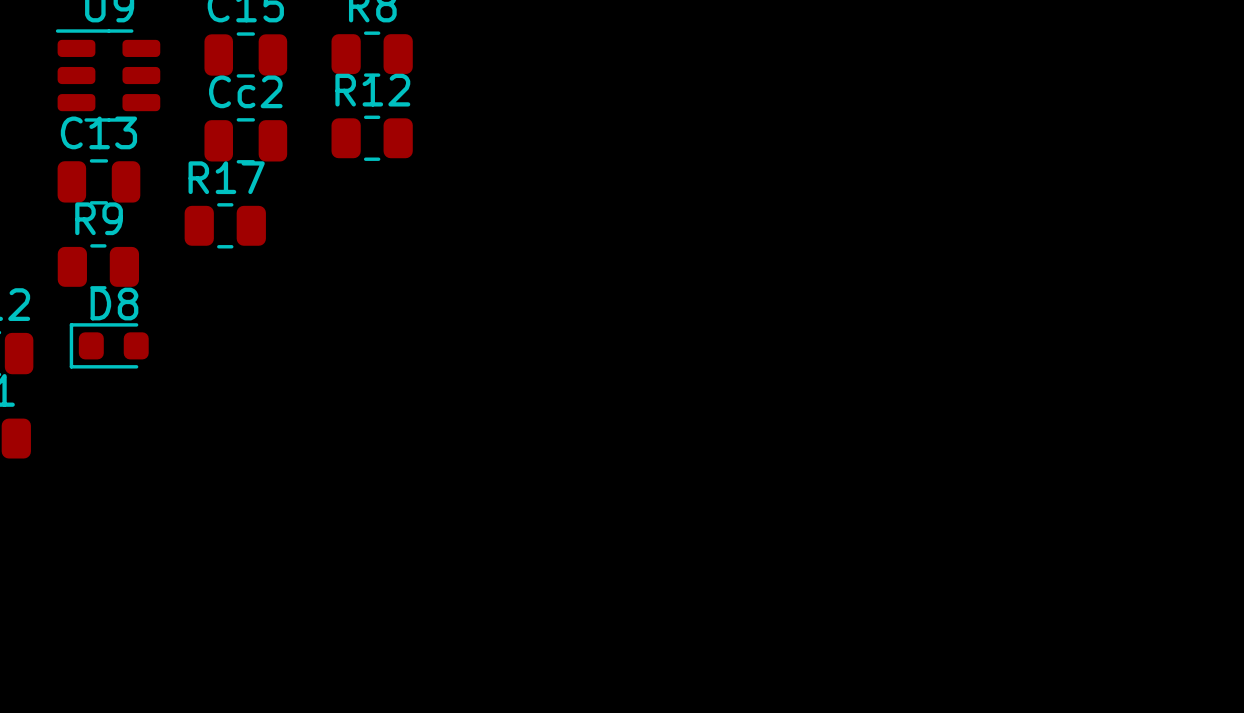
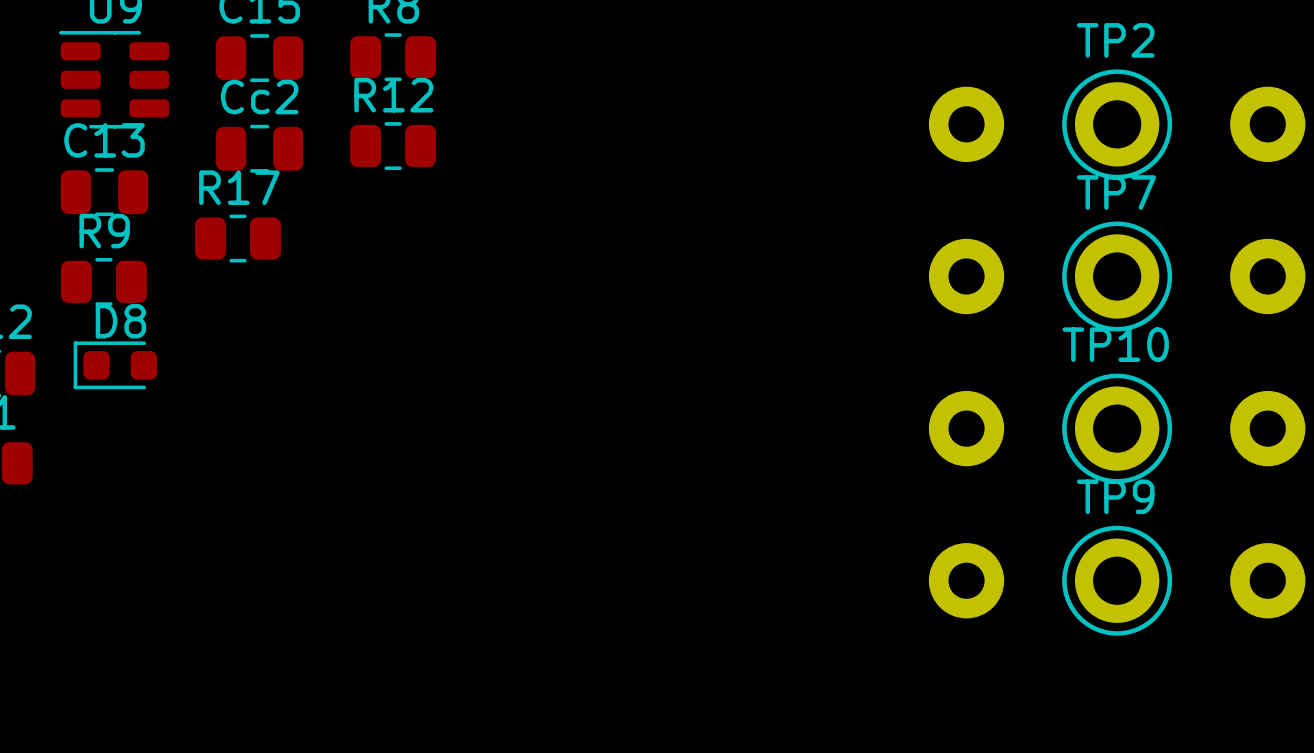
TP2: none -> (1117, 124)
TP7: none -> (1117, 276)
TP10: none -> (1117, 428)
TP9: none -> (1117, 580)

